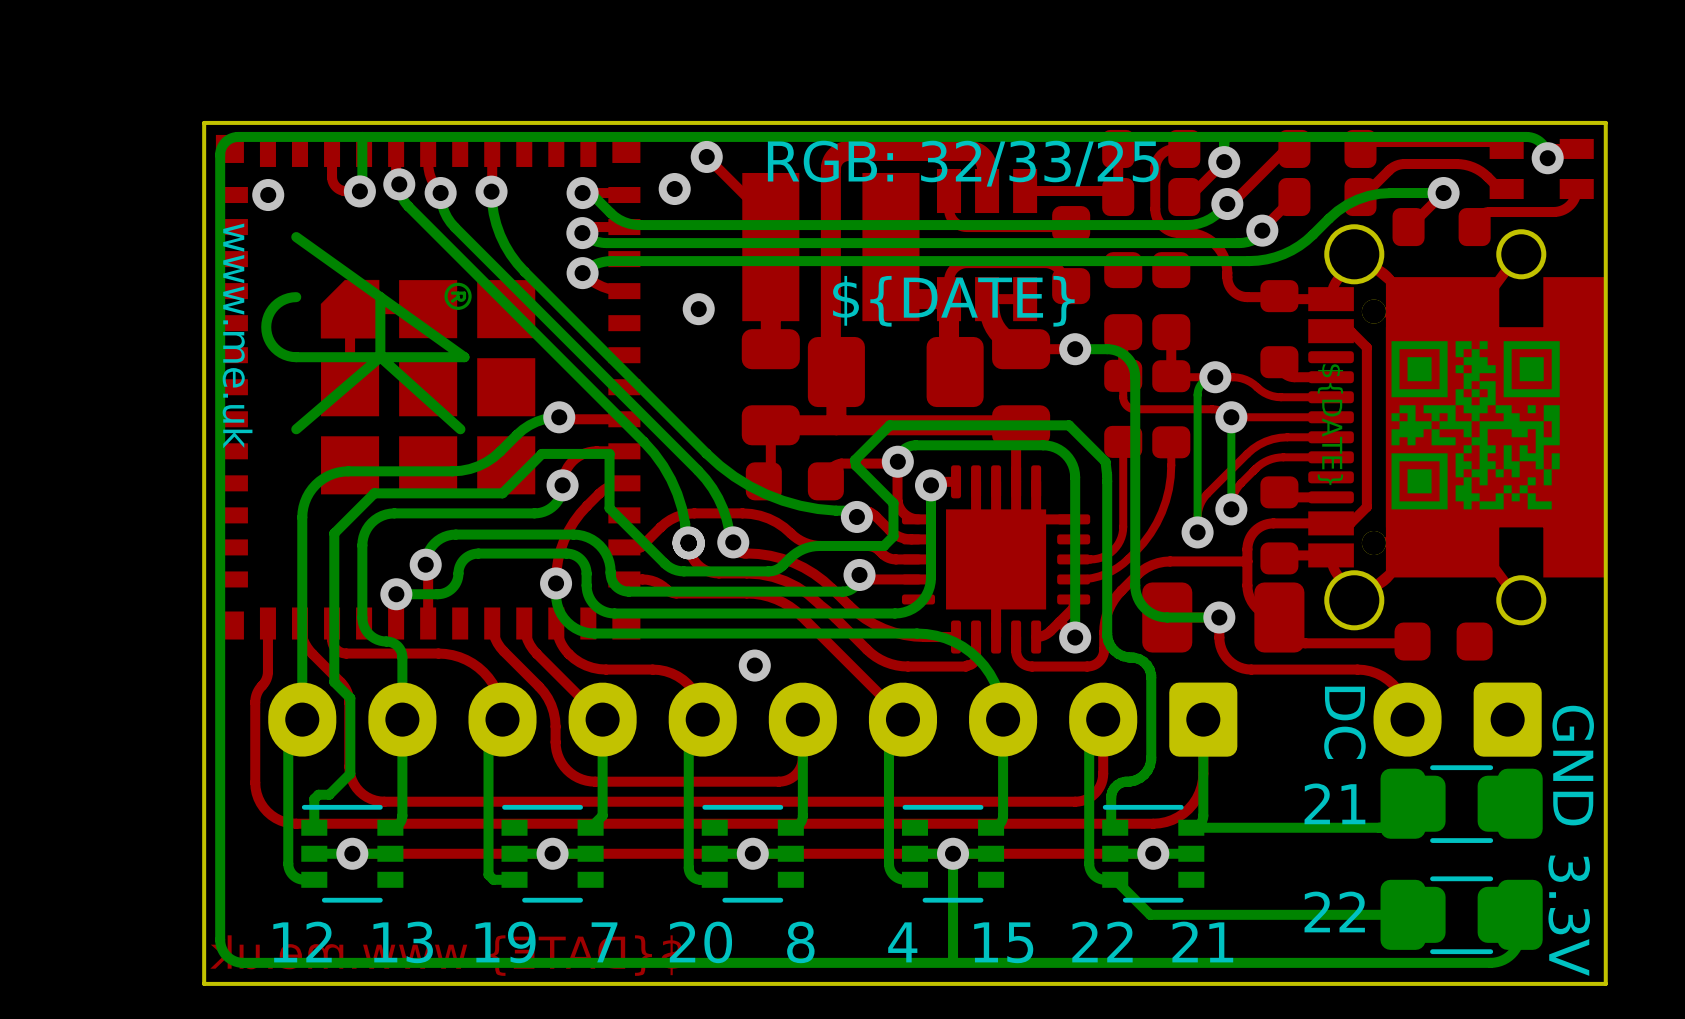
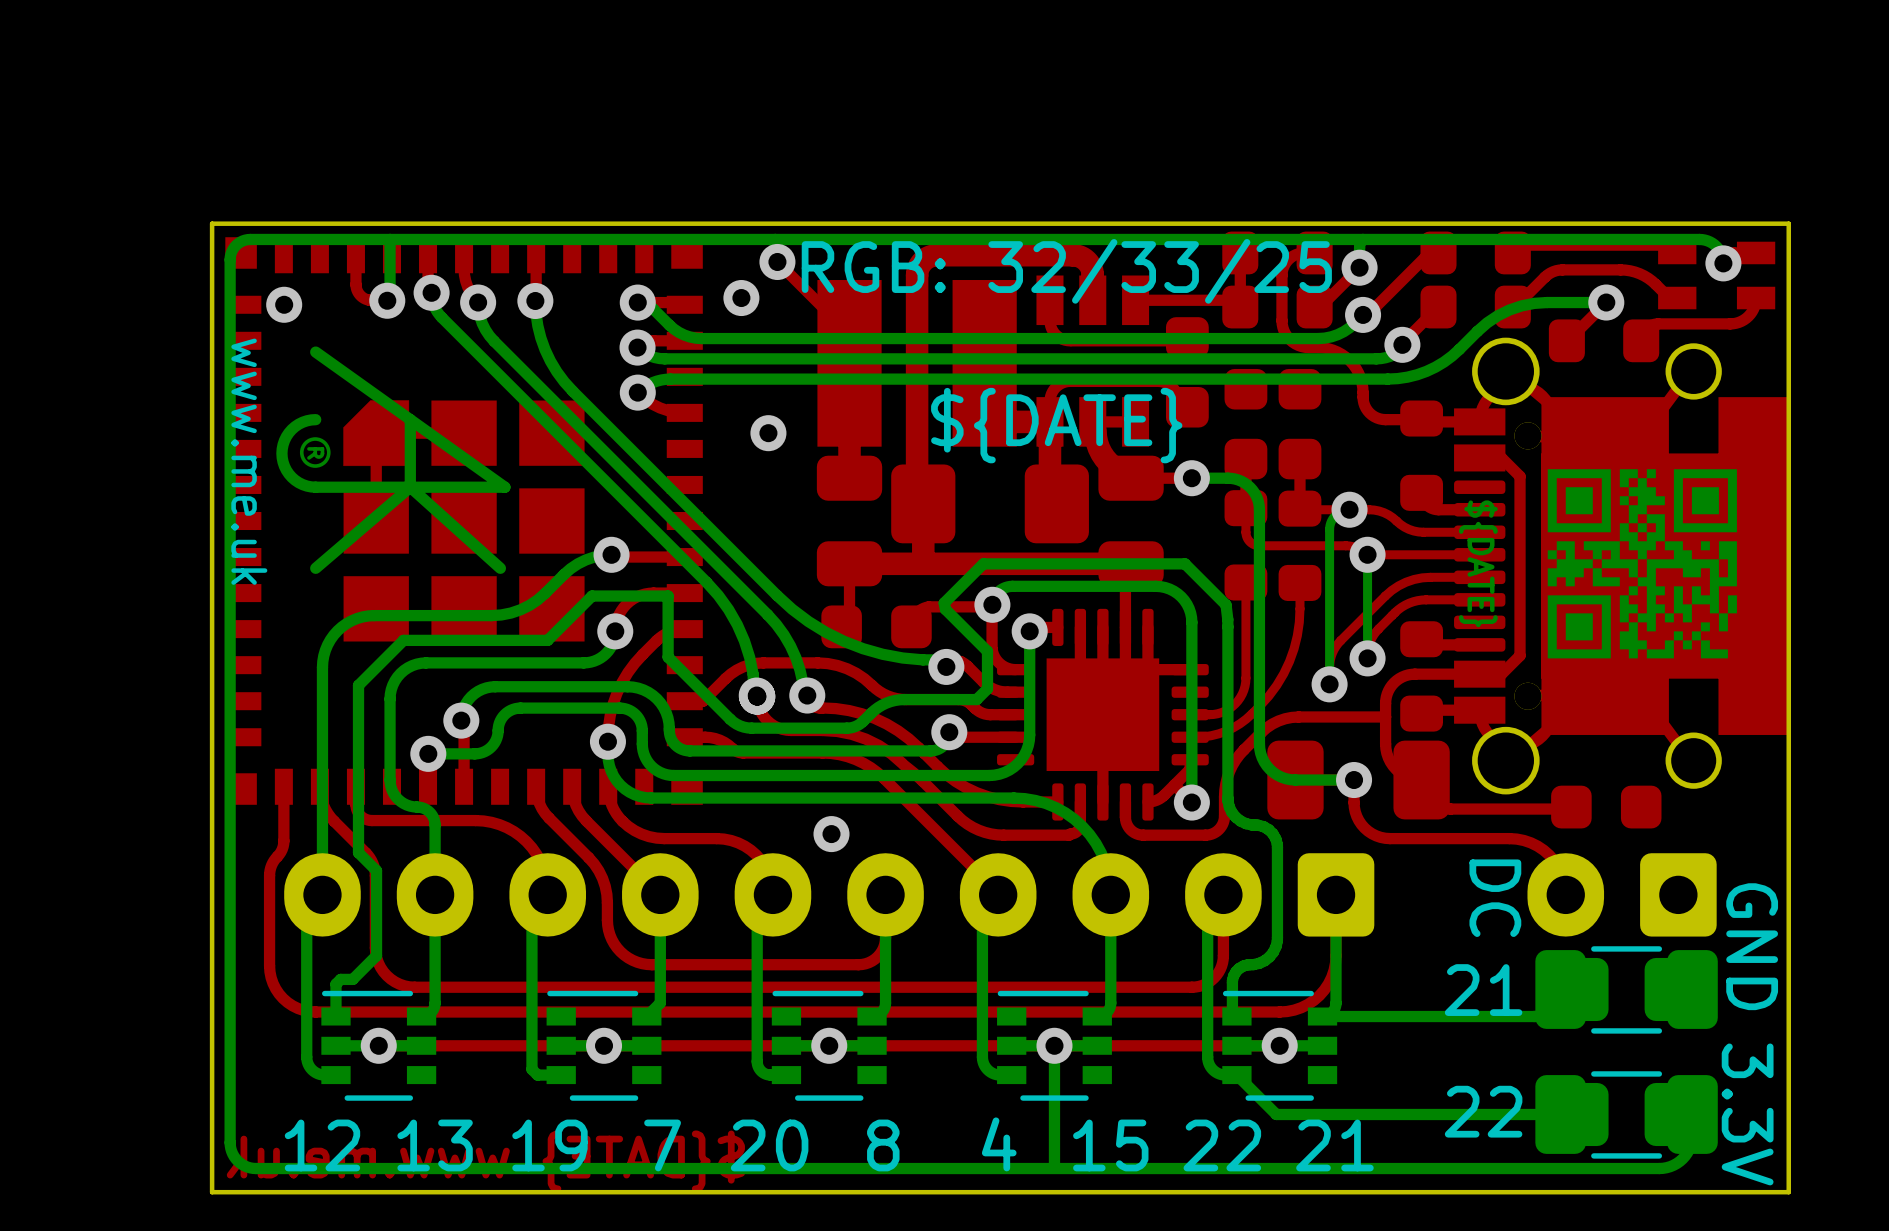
drawing shape: [261, 232, 472, 435] -> [276, 346, 511, 574]

